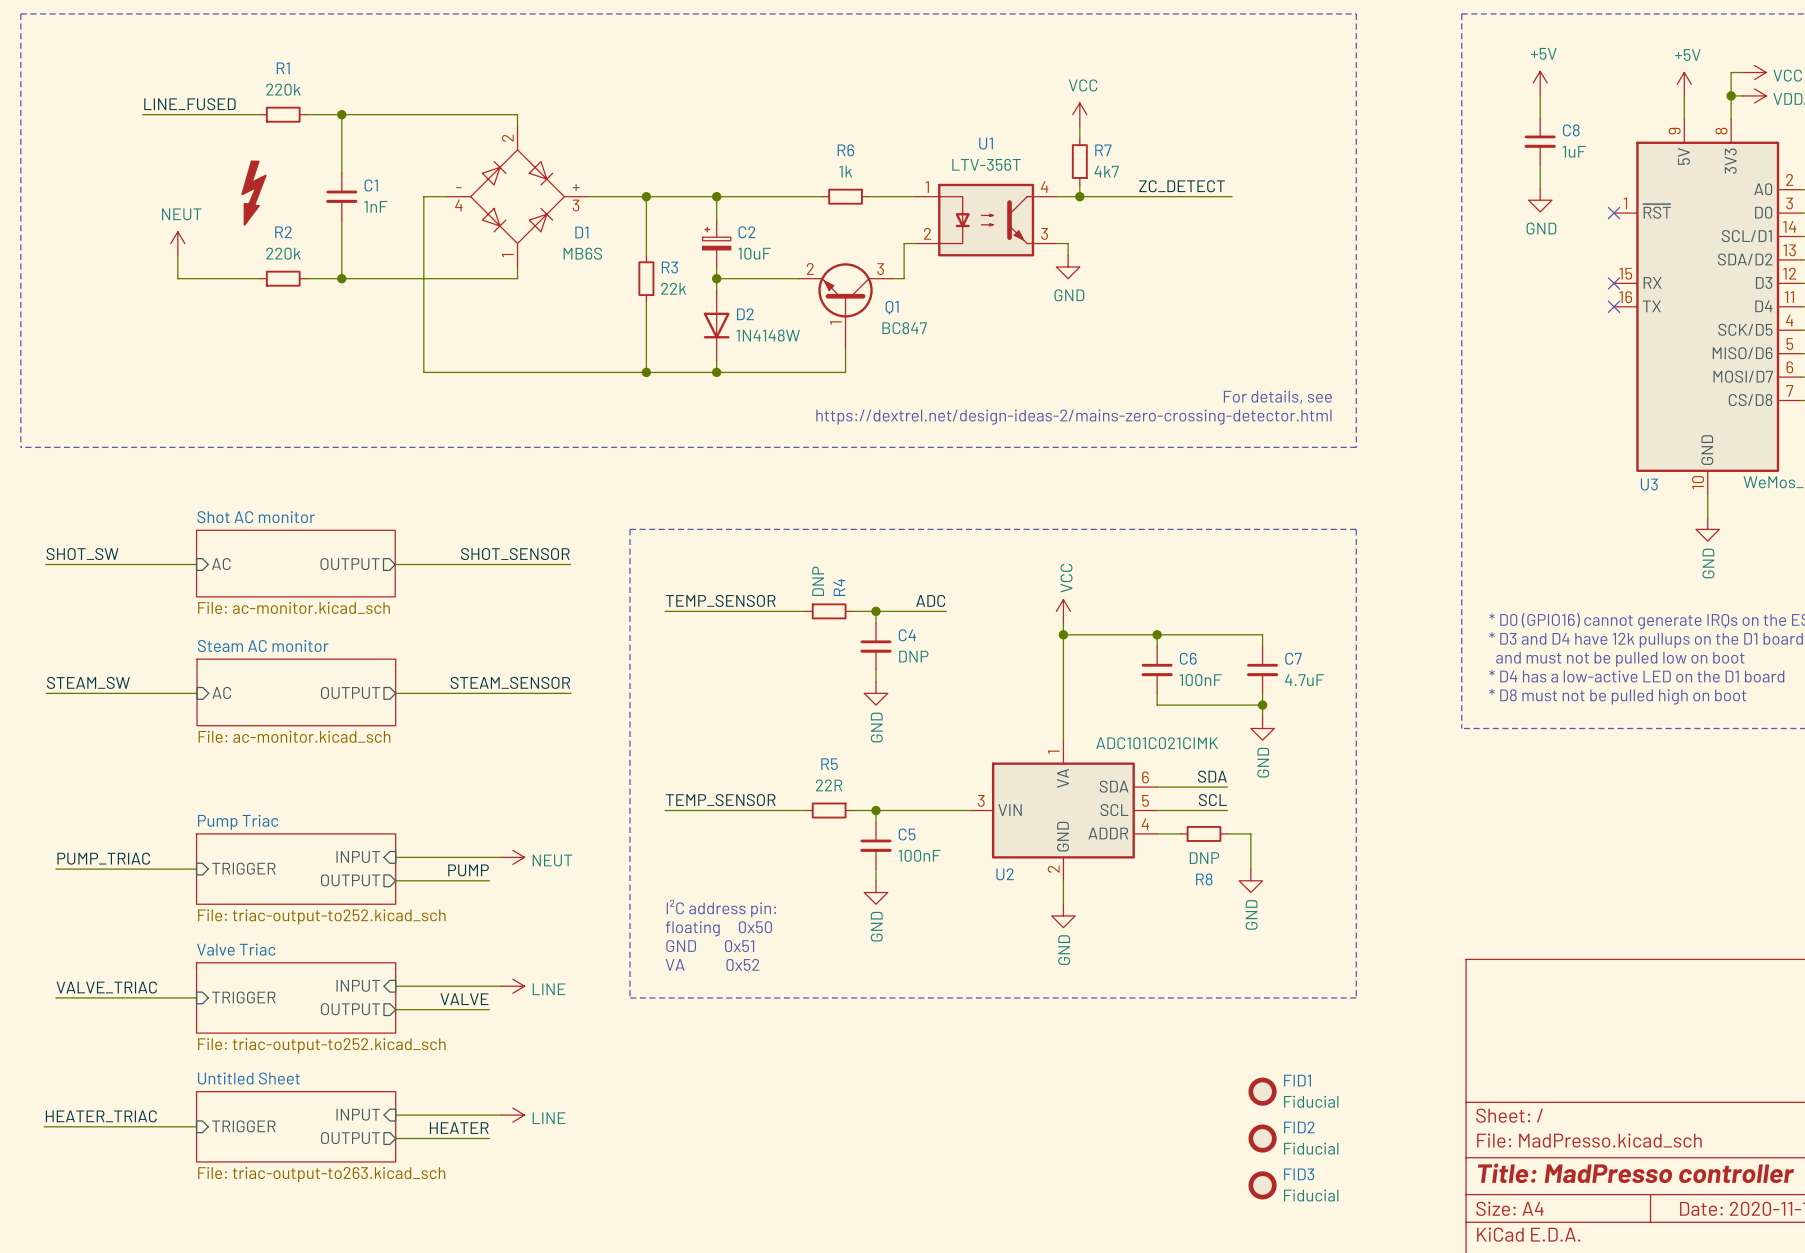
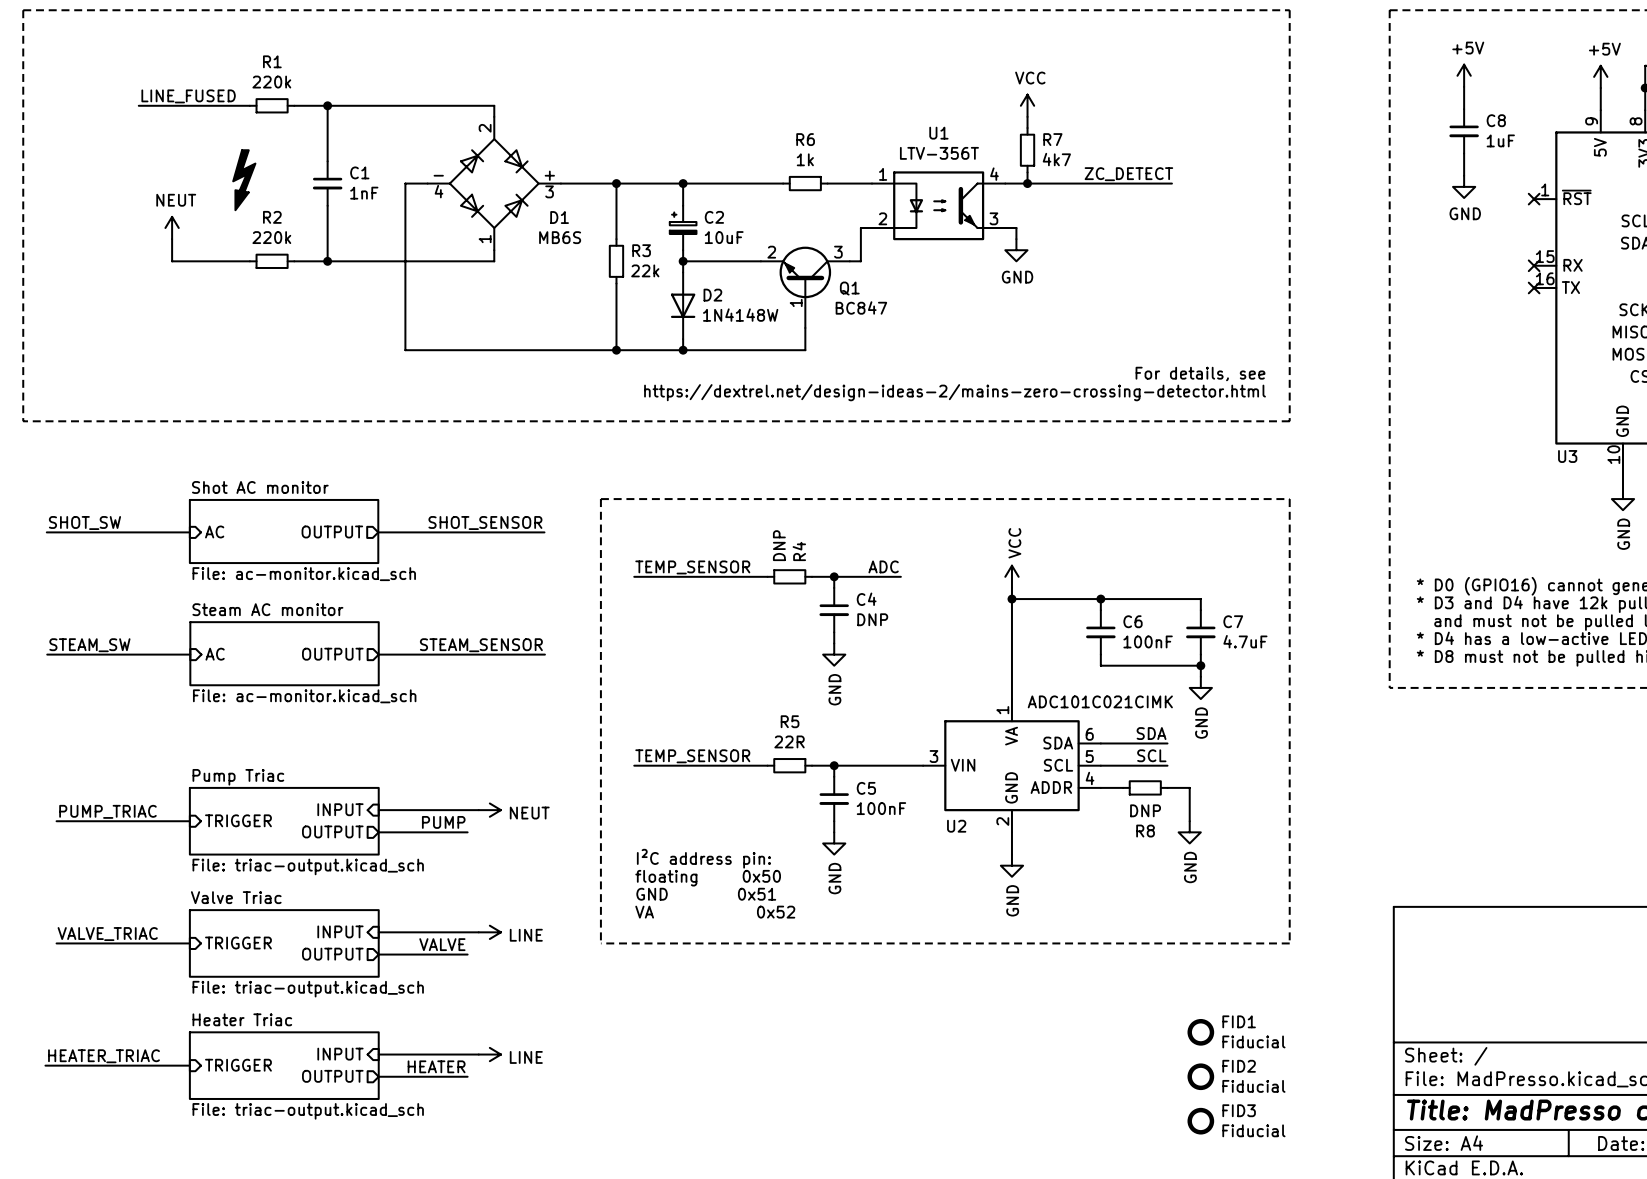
sheet Pump Triac value: File: triac-output-to252.kicad_sch (321, 916) -> File: triac-output.kicad_sch (308, 866)
sheet Valve Triac value: File: triac-output-to252.kicad_sch (321, 1045) -> File: triac-output.kicad_sch (308, 989)
sheet Untitled Sheet name: Untitled Sheet (248, 1078) -> Heater Triac (242, 1019)
sheet Untitled Sheet value: File: triac-output-to263.kicad_sch (321, 1174) -> File: triac-output.kicad_sch (308, 1111)

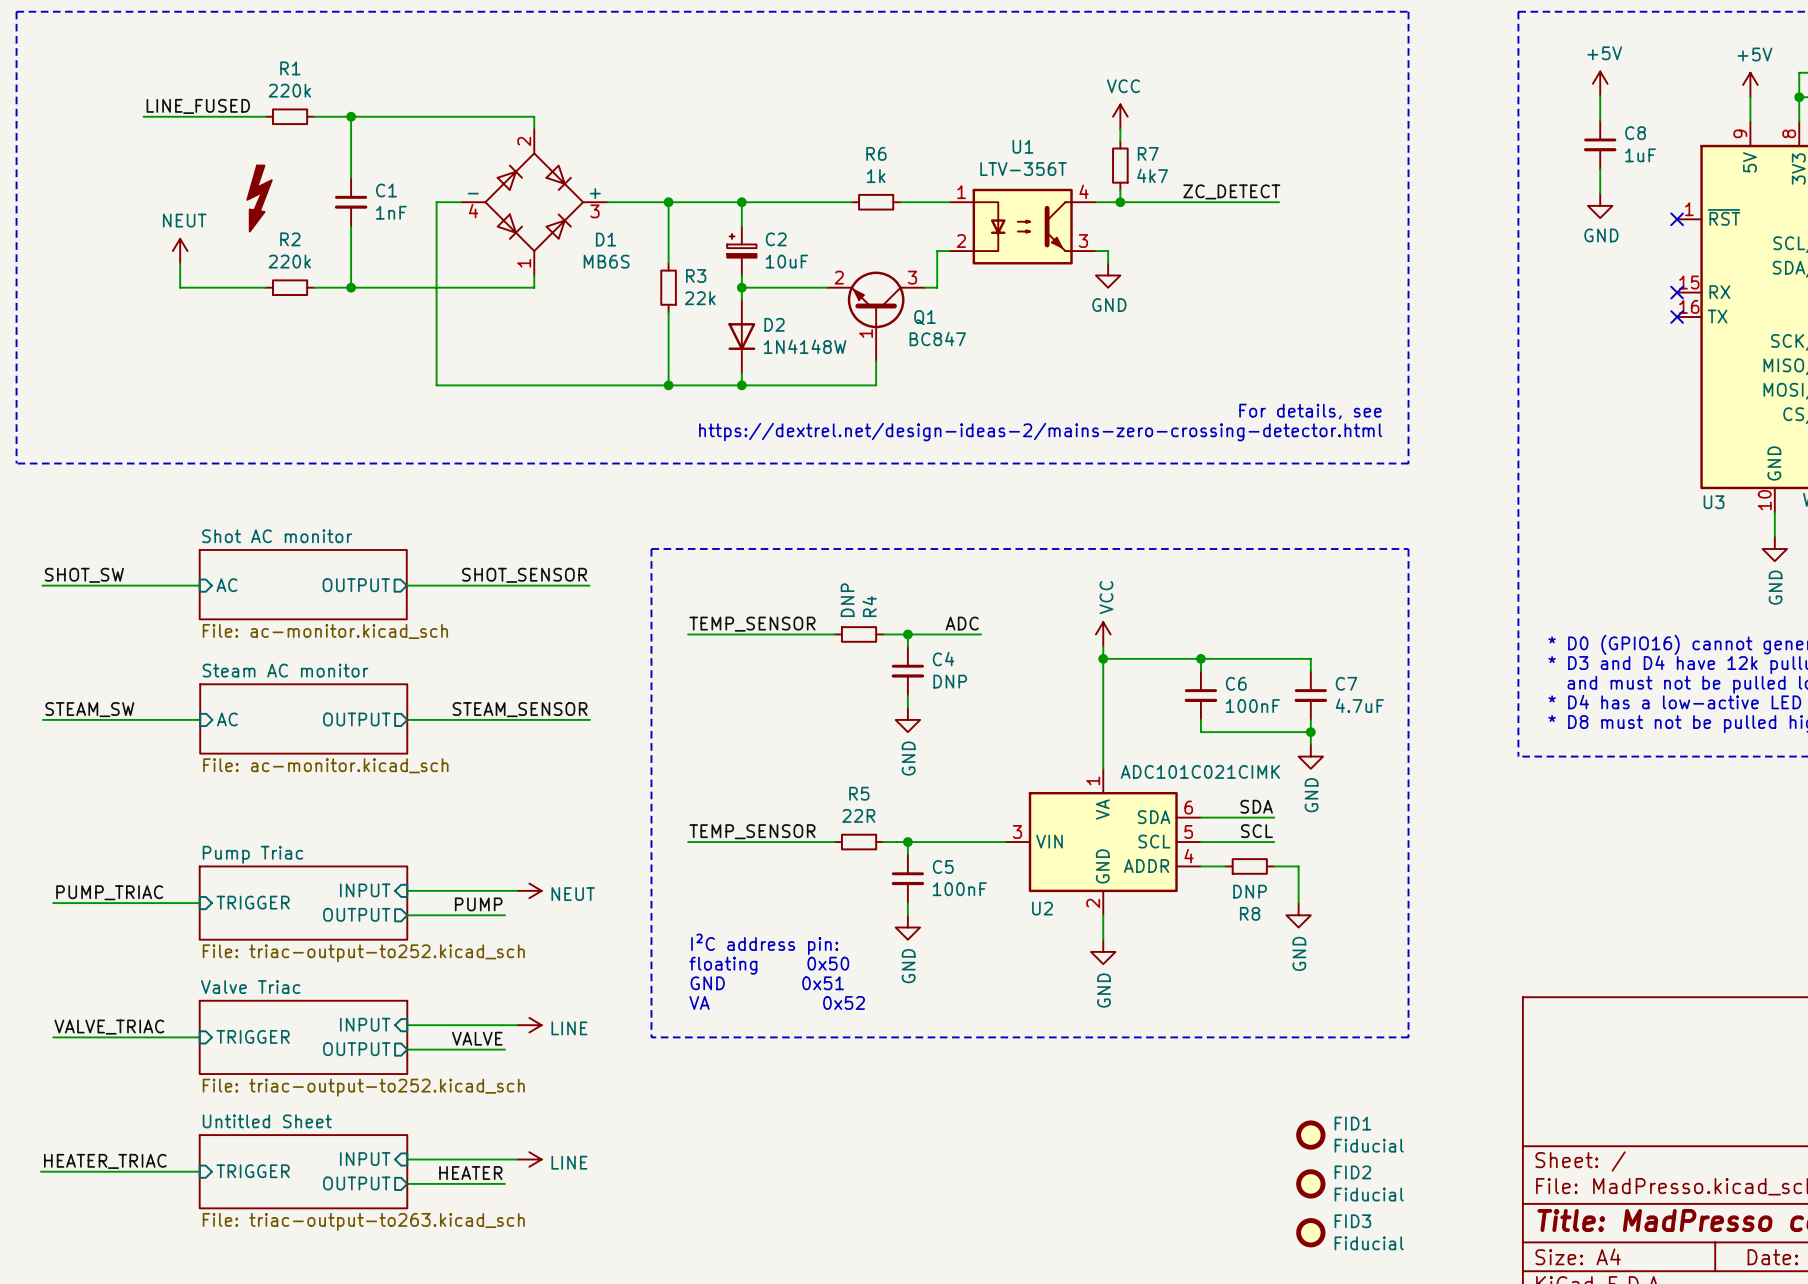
sheet Pump Triac value: File: triac-output.kicad_sch (308, 866) -> File: triac-output-to252.kicad_sch (363, 953)
sheet Valve Triac value: File: triac-output.kicad_sch (308, 989) -> File: triac-output-to252.kicad_sch (363, 1087)
sheet Heater Triac name: Heater Triac (242, 1019) -> Untitled Sheet (267, 1121)
sheet Heater Triac value: File: triac-output.kicad_sch (308, 1111) -> File: triac-output-to263.kicad_sch (363, 1221)

